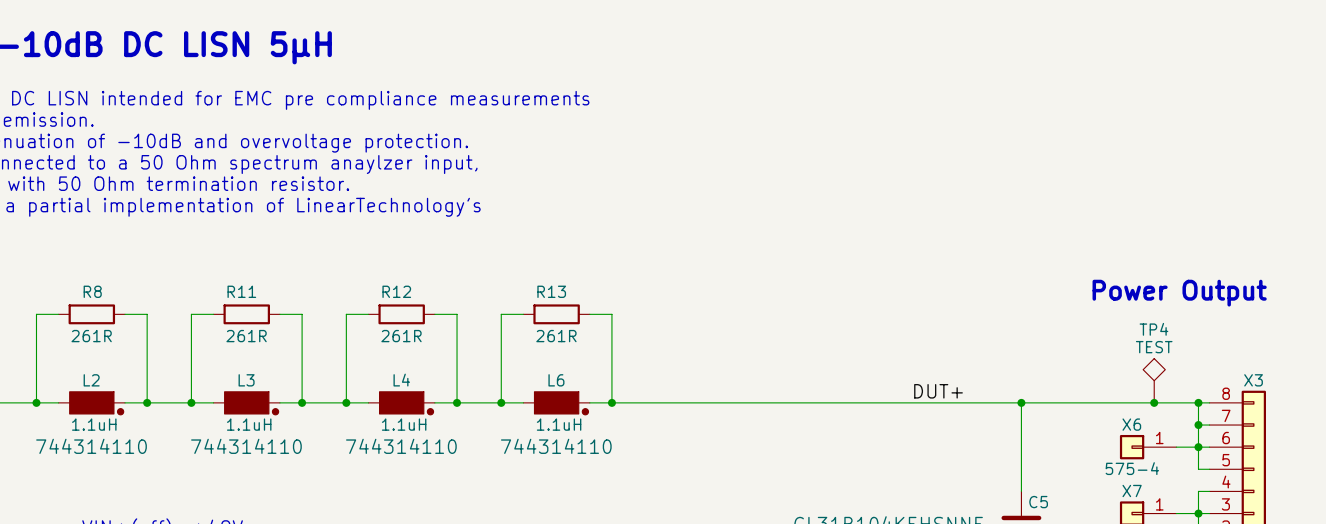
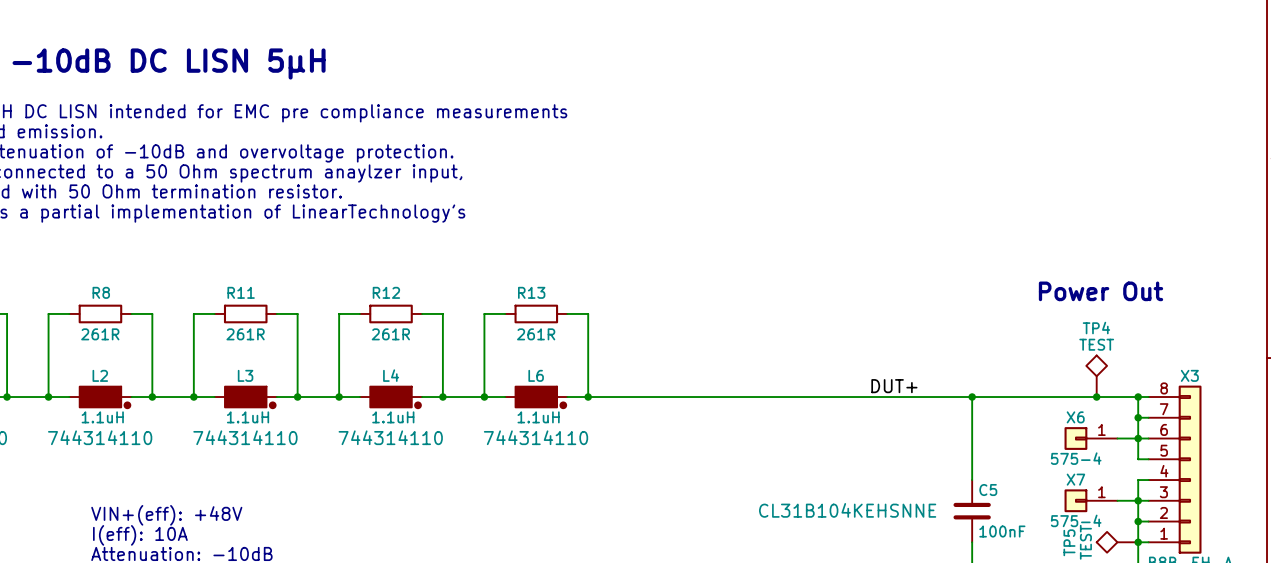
text: Power Output (1179, 293) -> Power Out (1101, 291)

